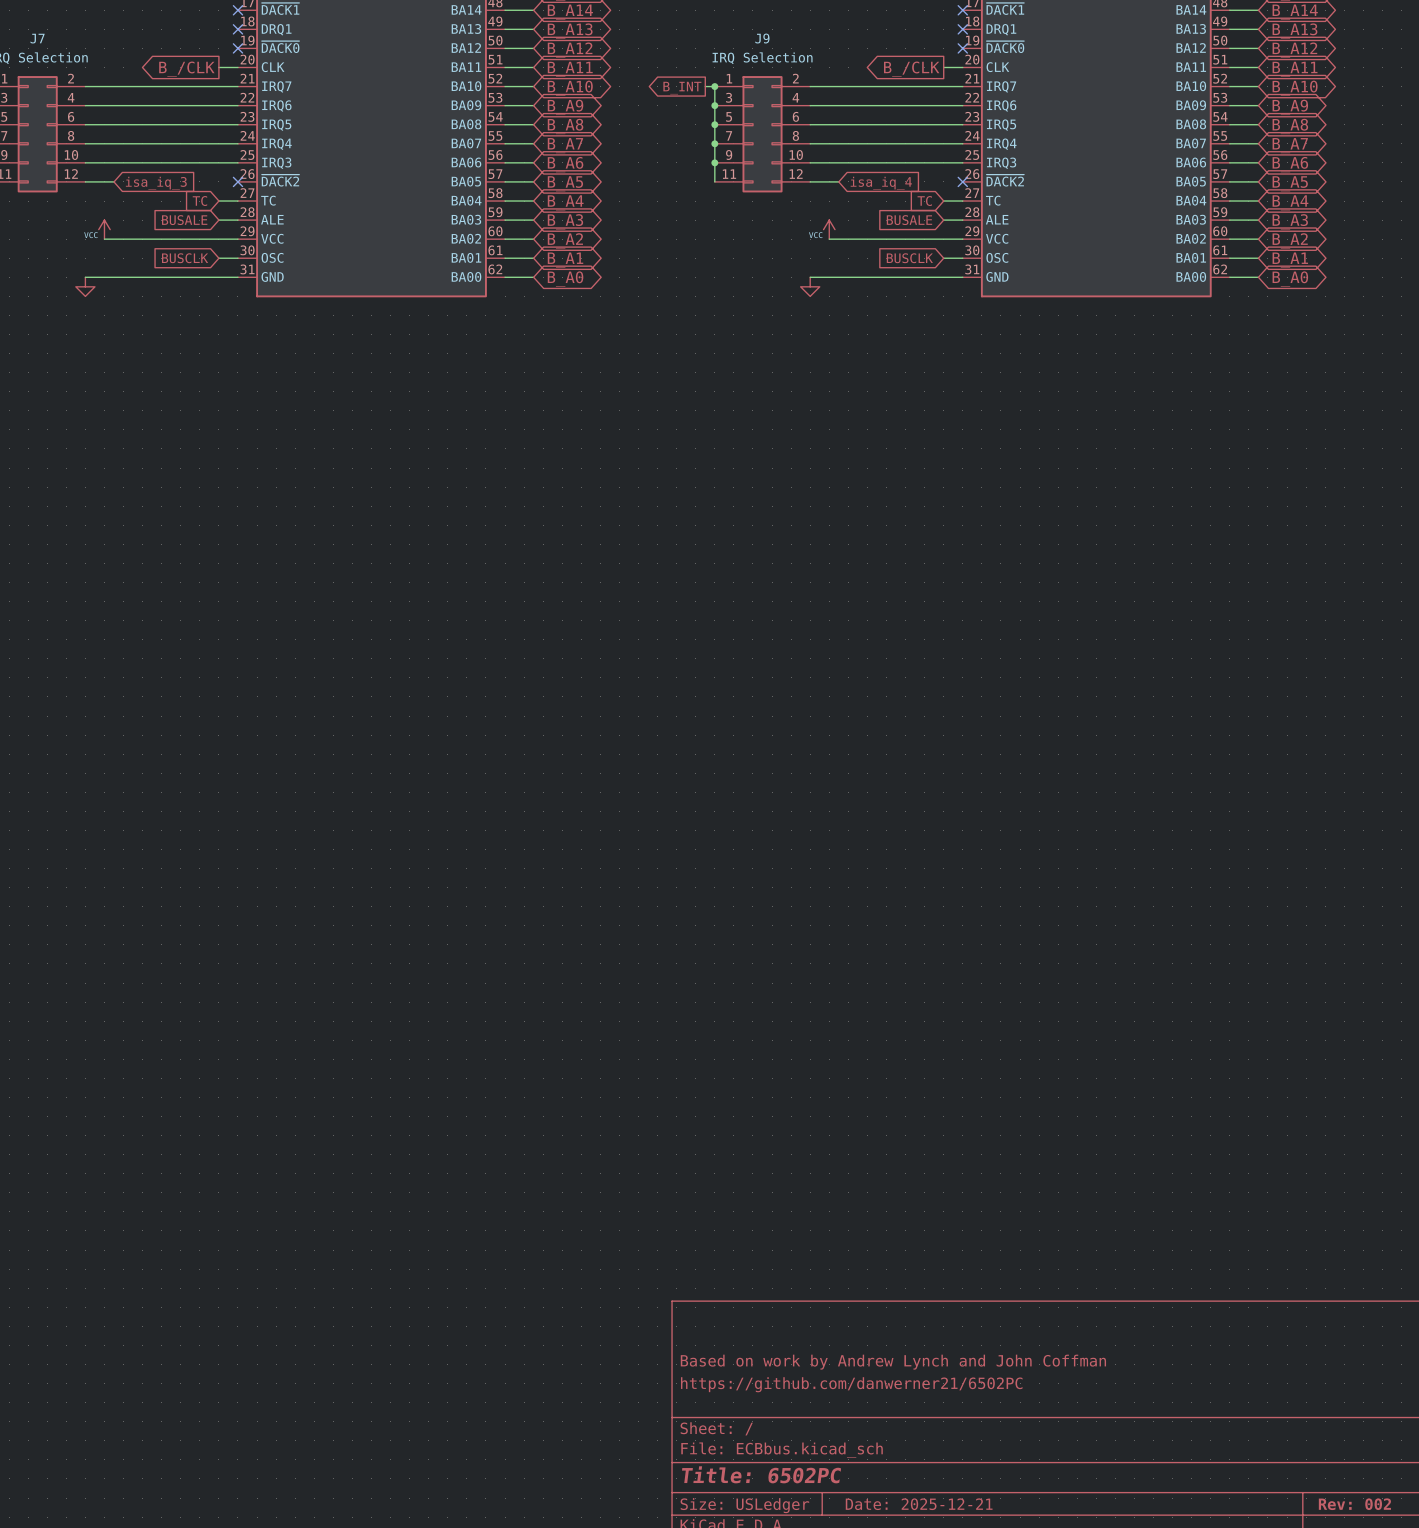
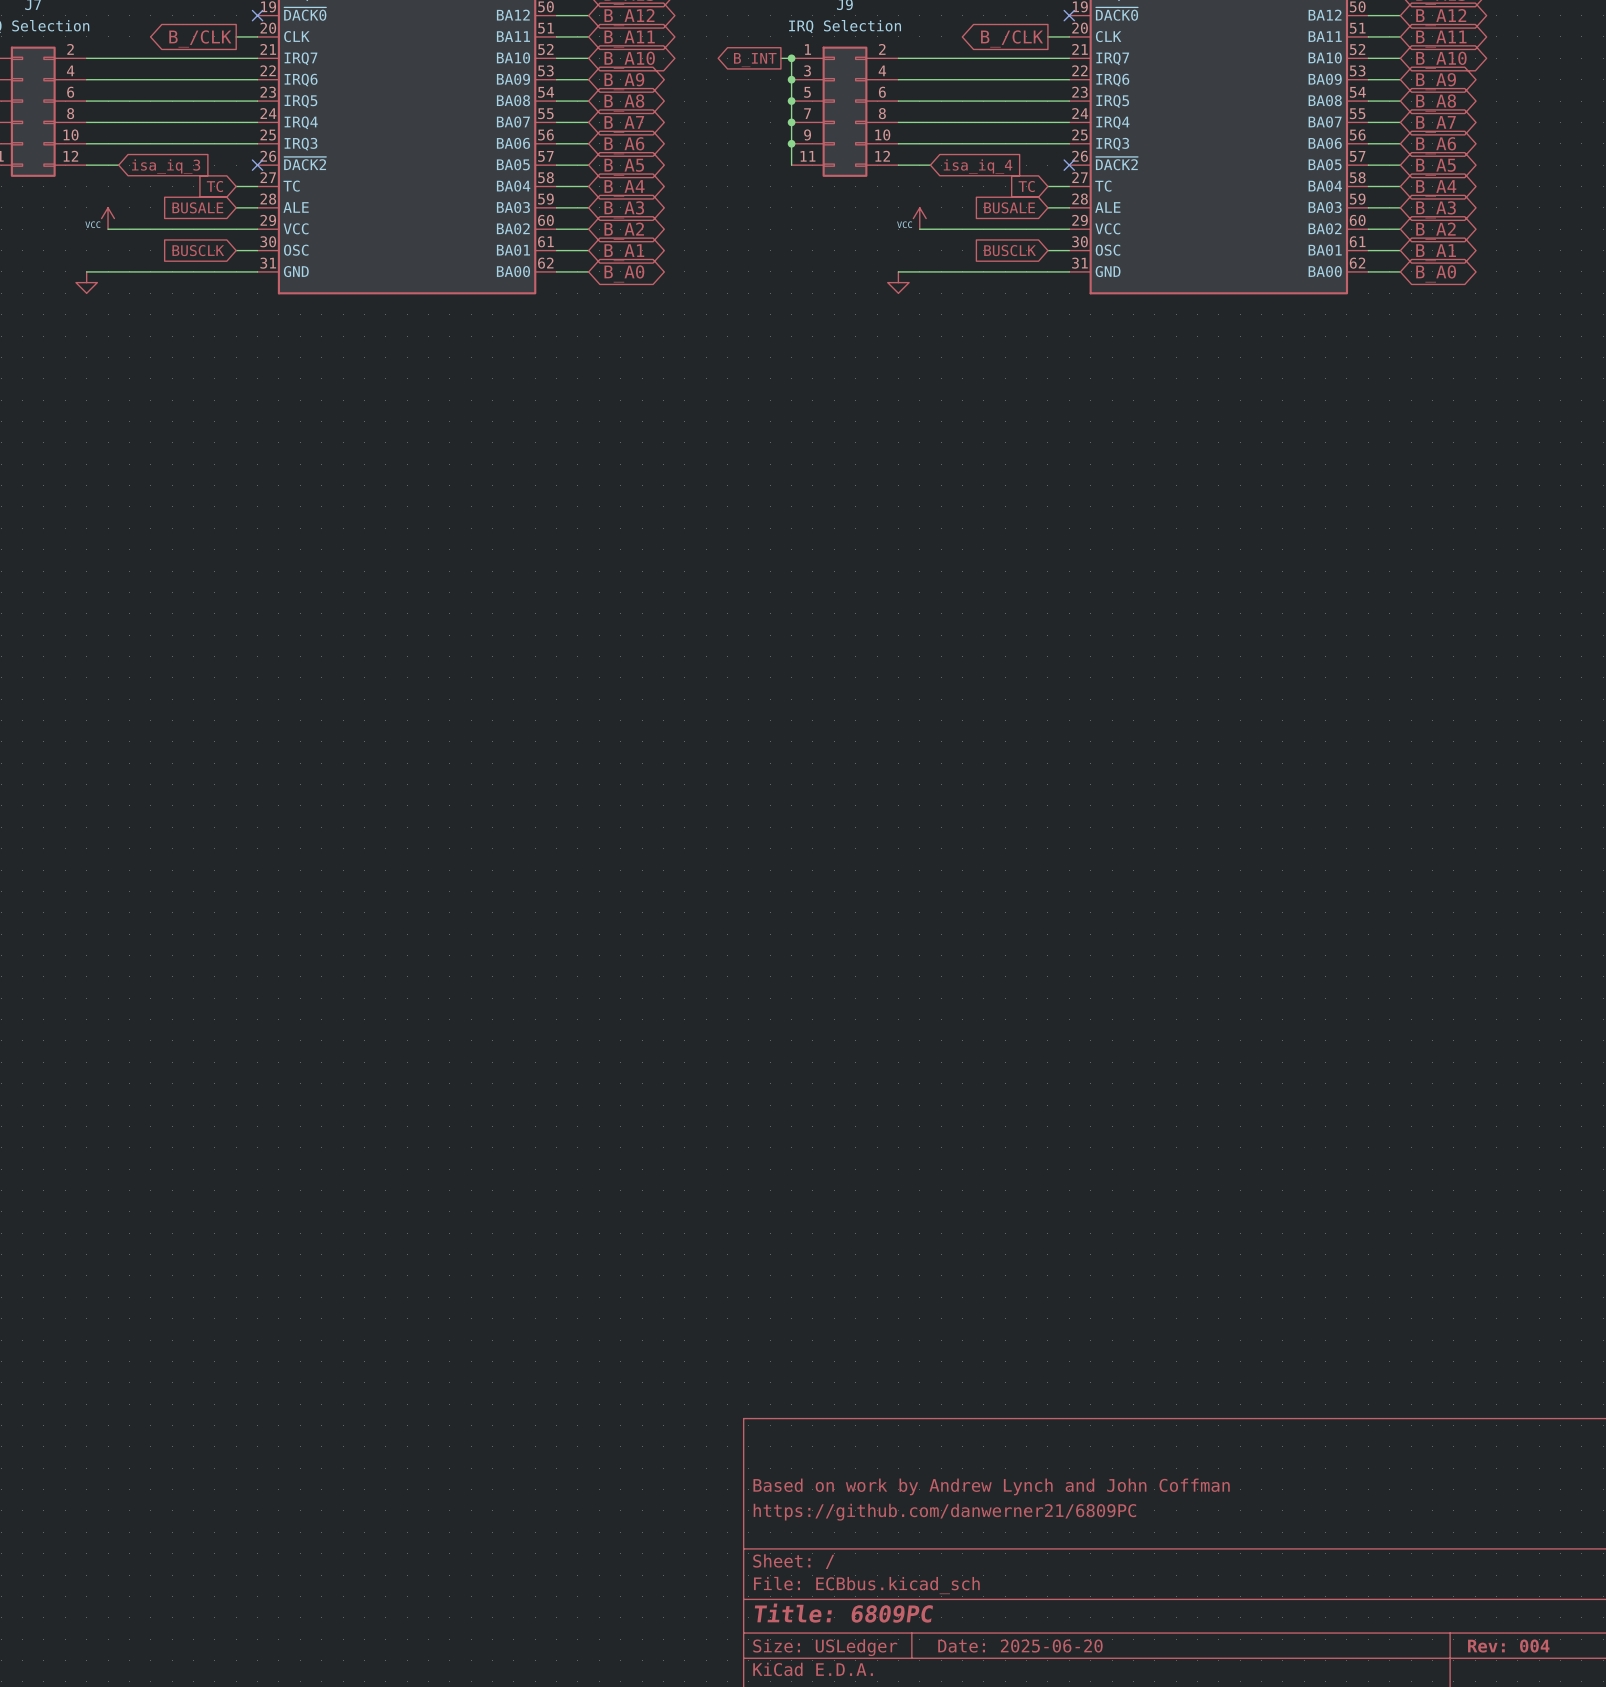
title block: https://github.com/danwerner21/6502PC (851, 1384) -> https://github.com/danwerner21/6809PC (944, 1512)
title block: Title: 6502PC (761, 1474) -> Title: 6809PC (843, 1613)
title block: Date: 2025-12-21 (919, 1504) -> Date: 2025-06-20 (1020, 1646)
title block: Rev: 002 (1354, 1504) -> Rev: 004 (1508, 1646)

